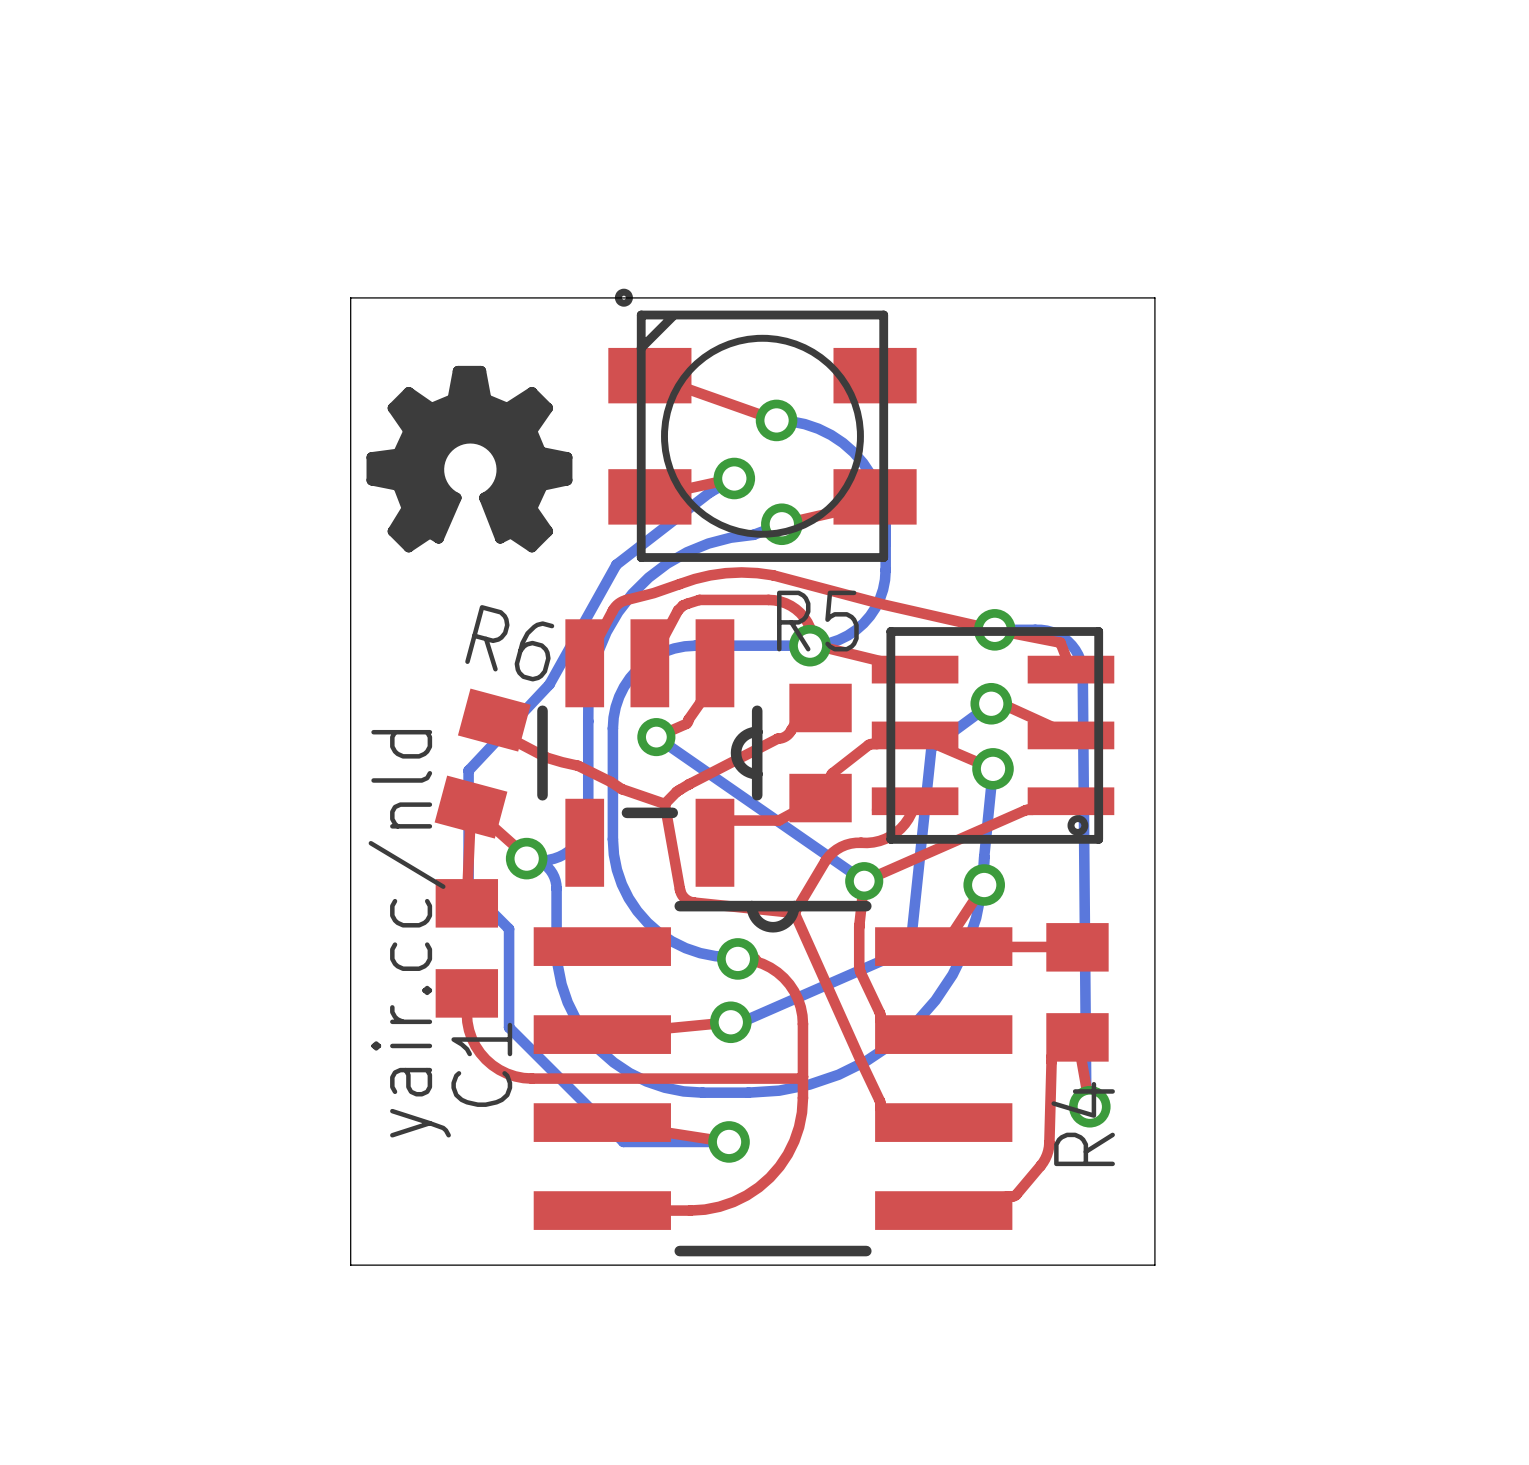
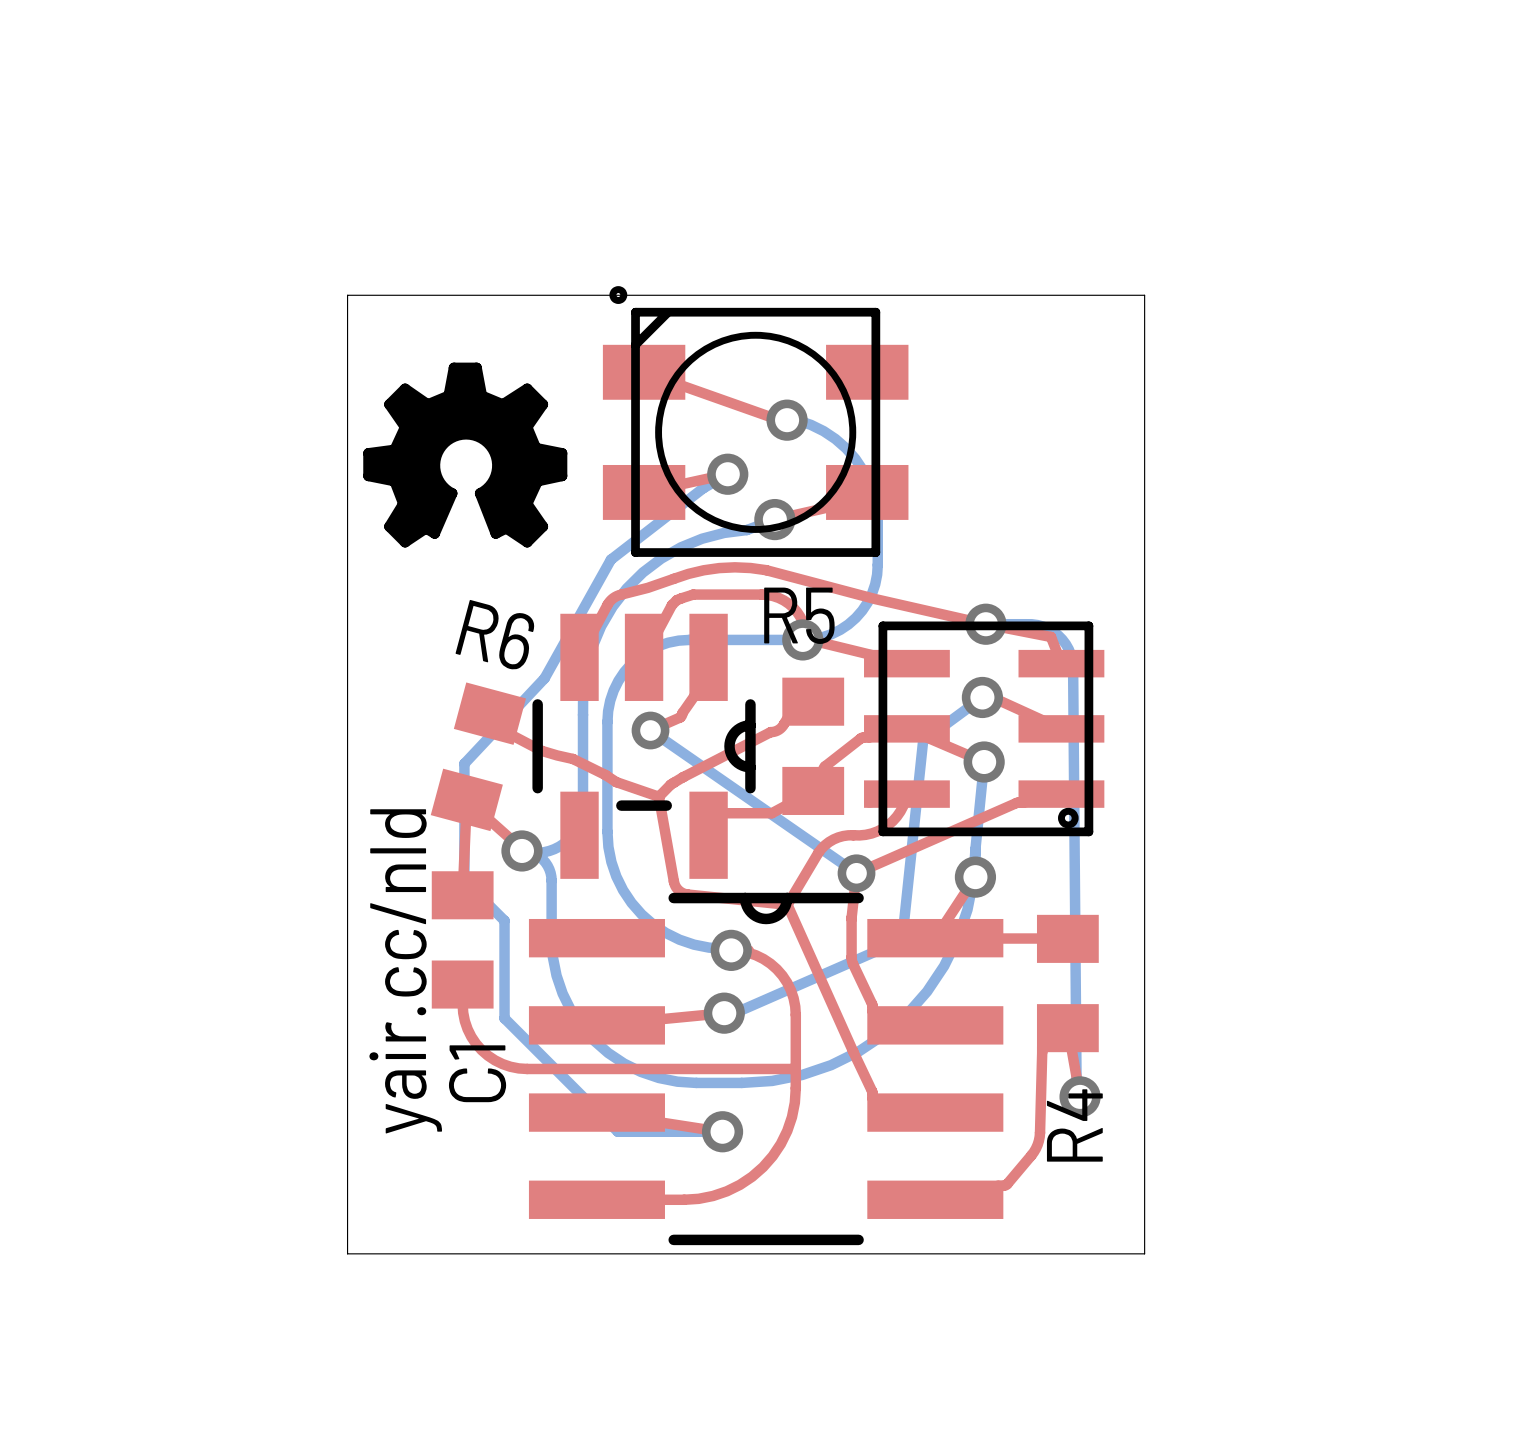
via position: (776, 420) -> (787, 420)

